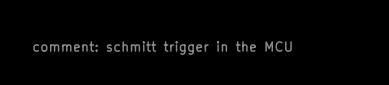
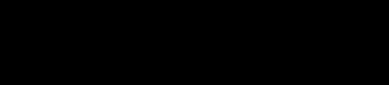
text: comment: schmitt trigger in the MCU (162, 48) -> none

